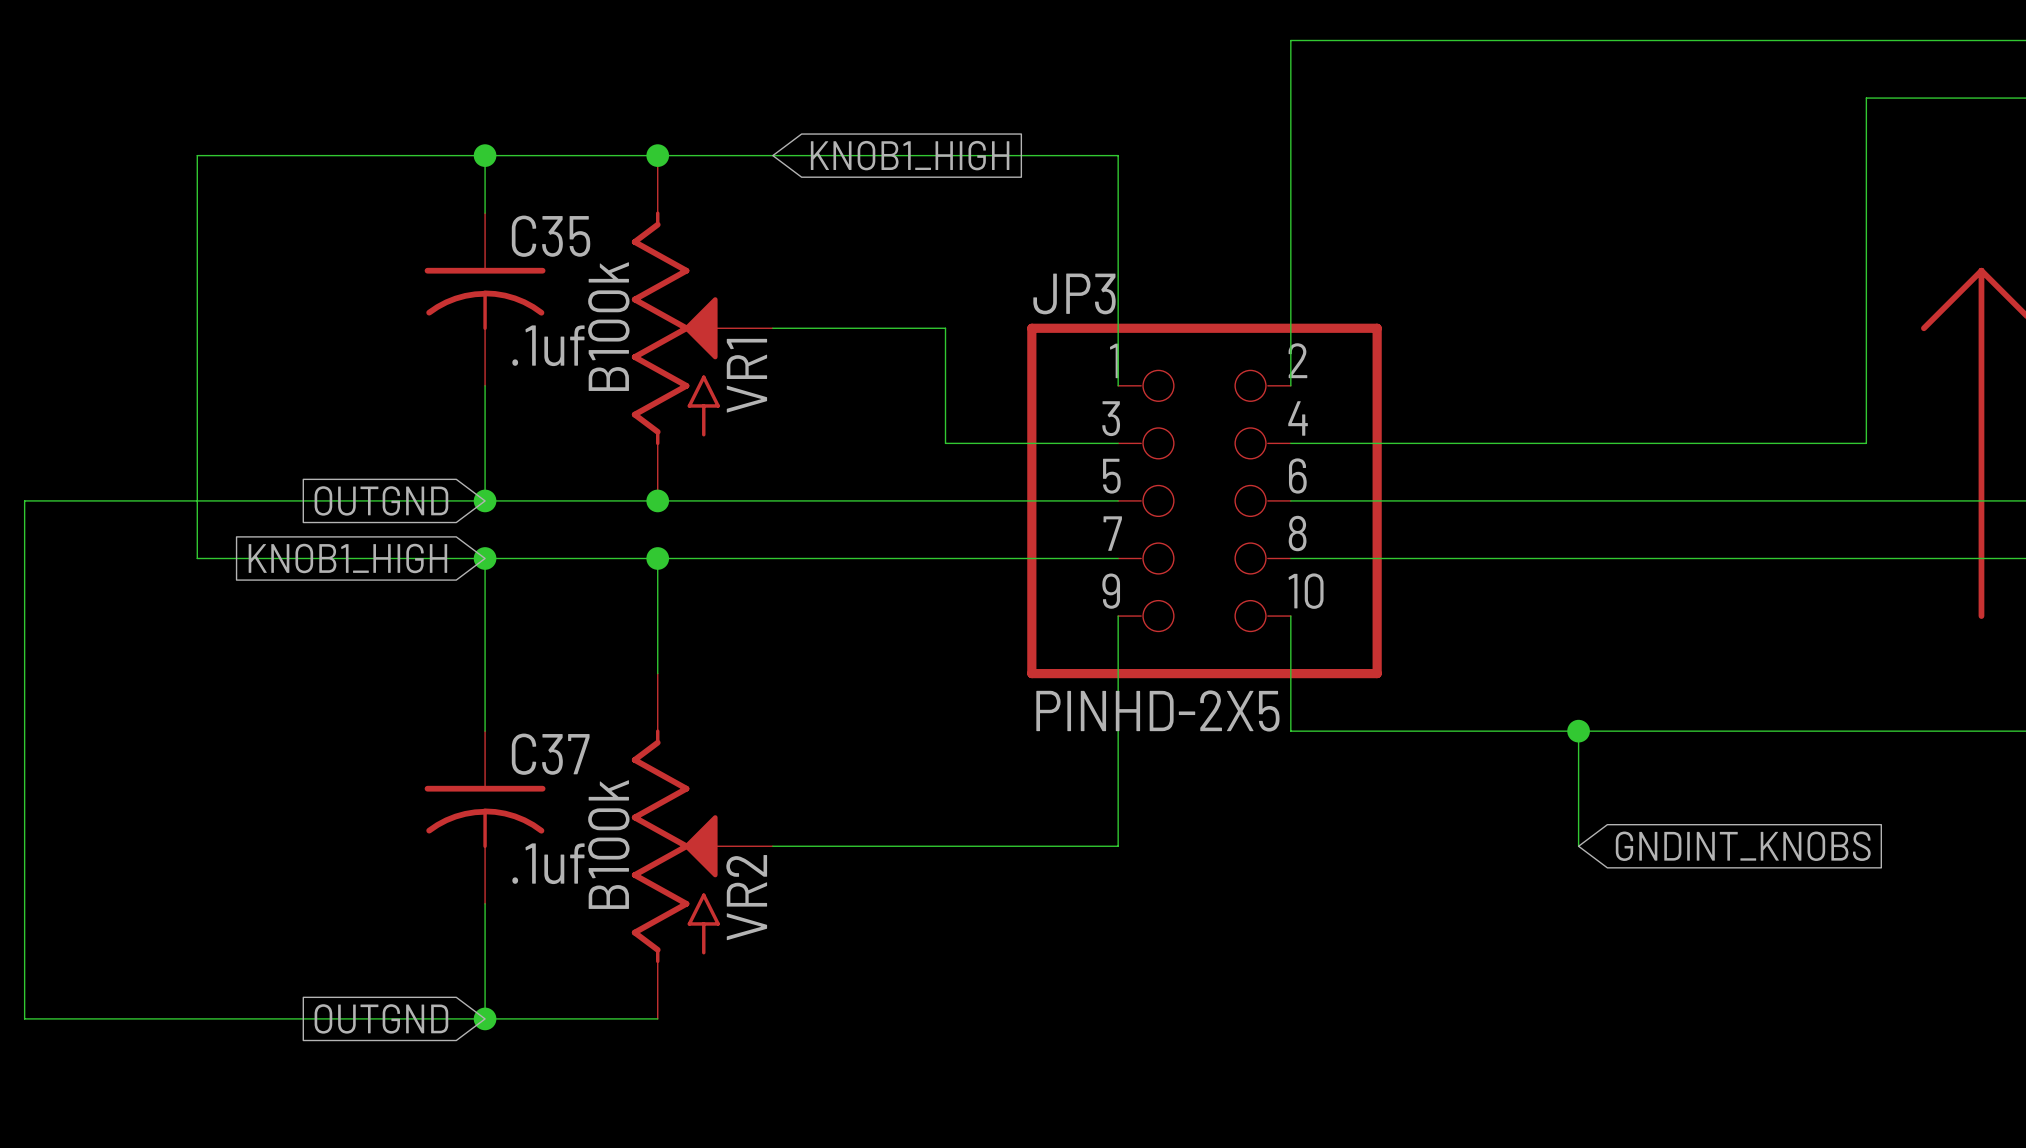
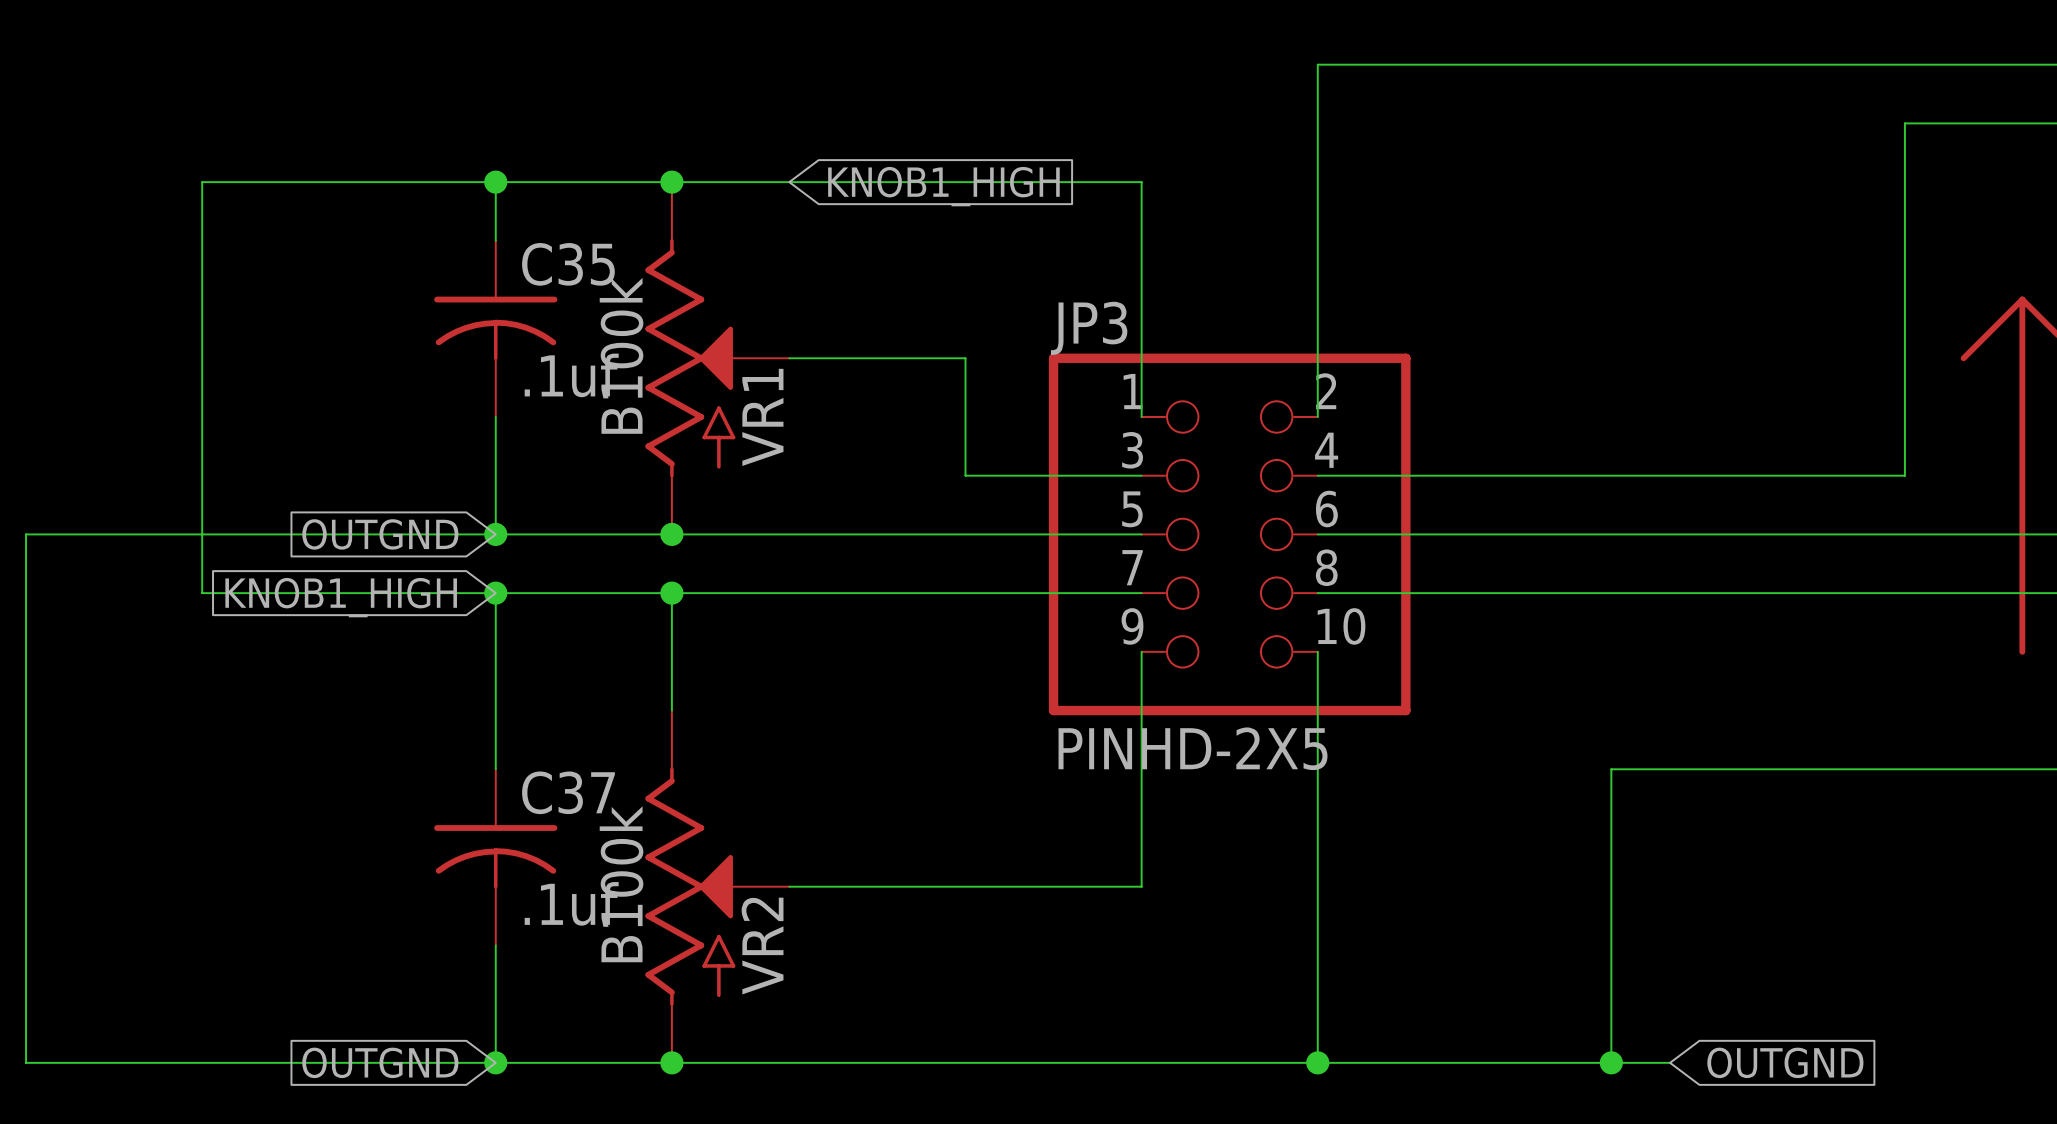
wire: (1290, 731) (1578, 731) -> (1317, 769) (1317, 1062)
junction: (1578, 731) -> none
wire: none -> (1611, 886) (1611, 1062)
global label: GNDINT_KNOBS (1743, 846) -> none
wire: none -> (671, 1062) (1670, 1062)
junction: none -> (671, 1062)
junction: none -> (1317, 1062)
junction: none -> (1611, 1062)
global label: none -> OUTGND (1785, 1062)

